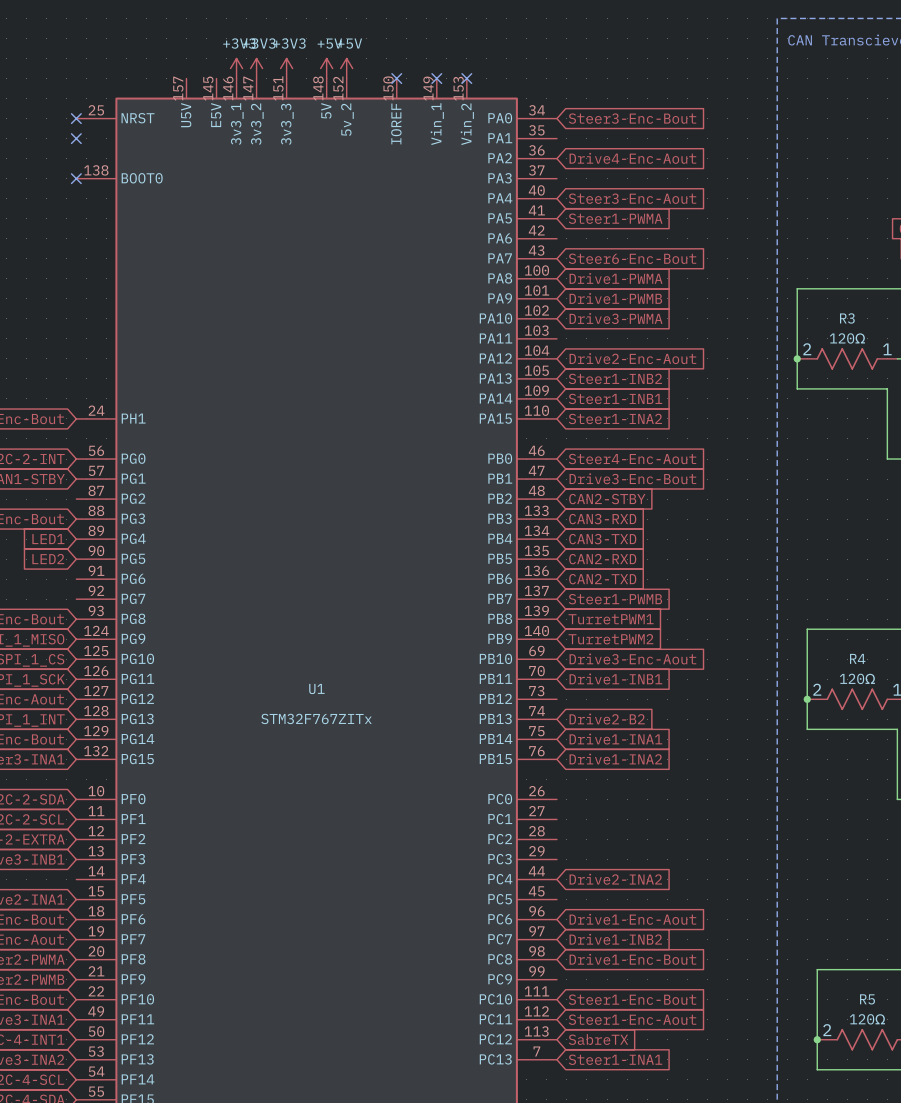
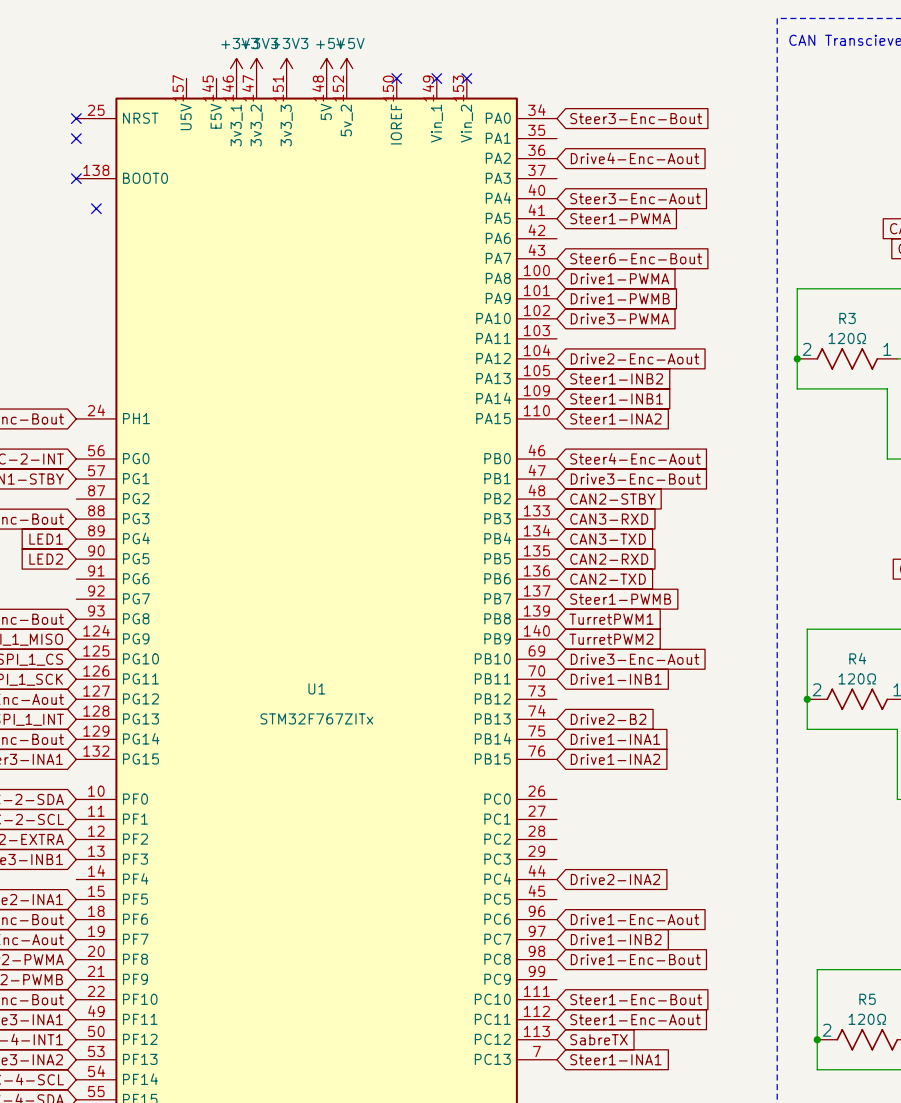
no-connect mark: none -> (96, 208)

